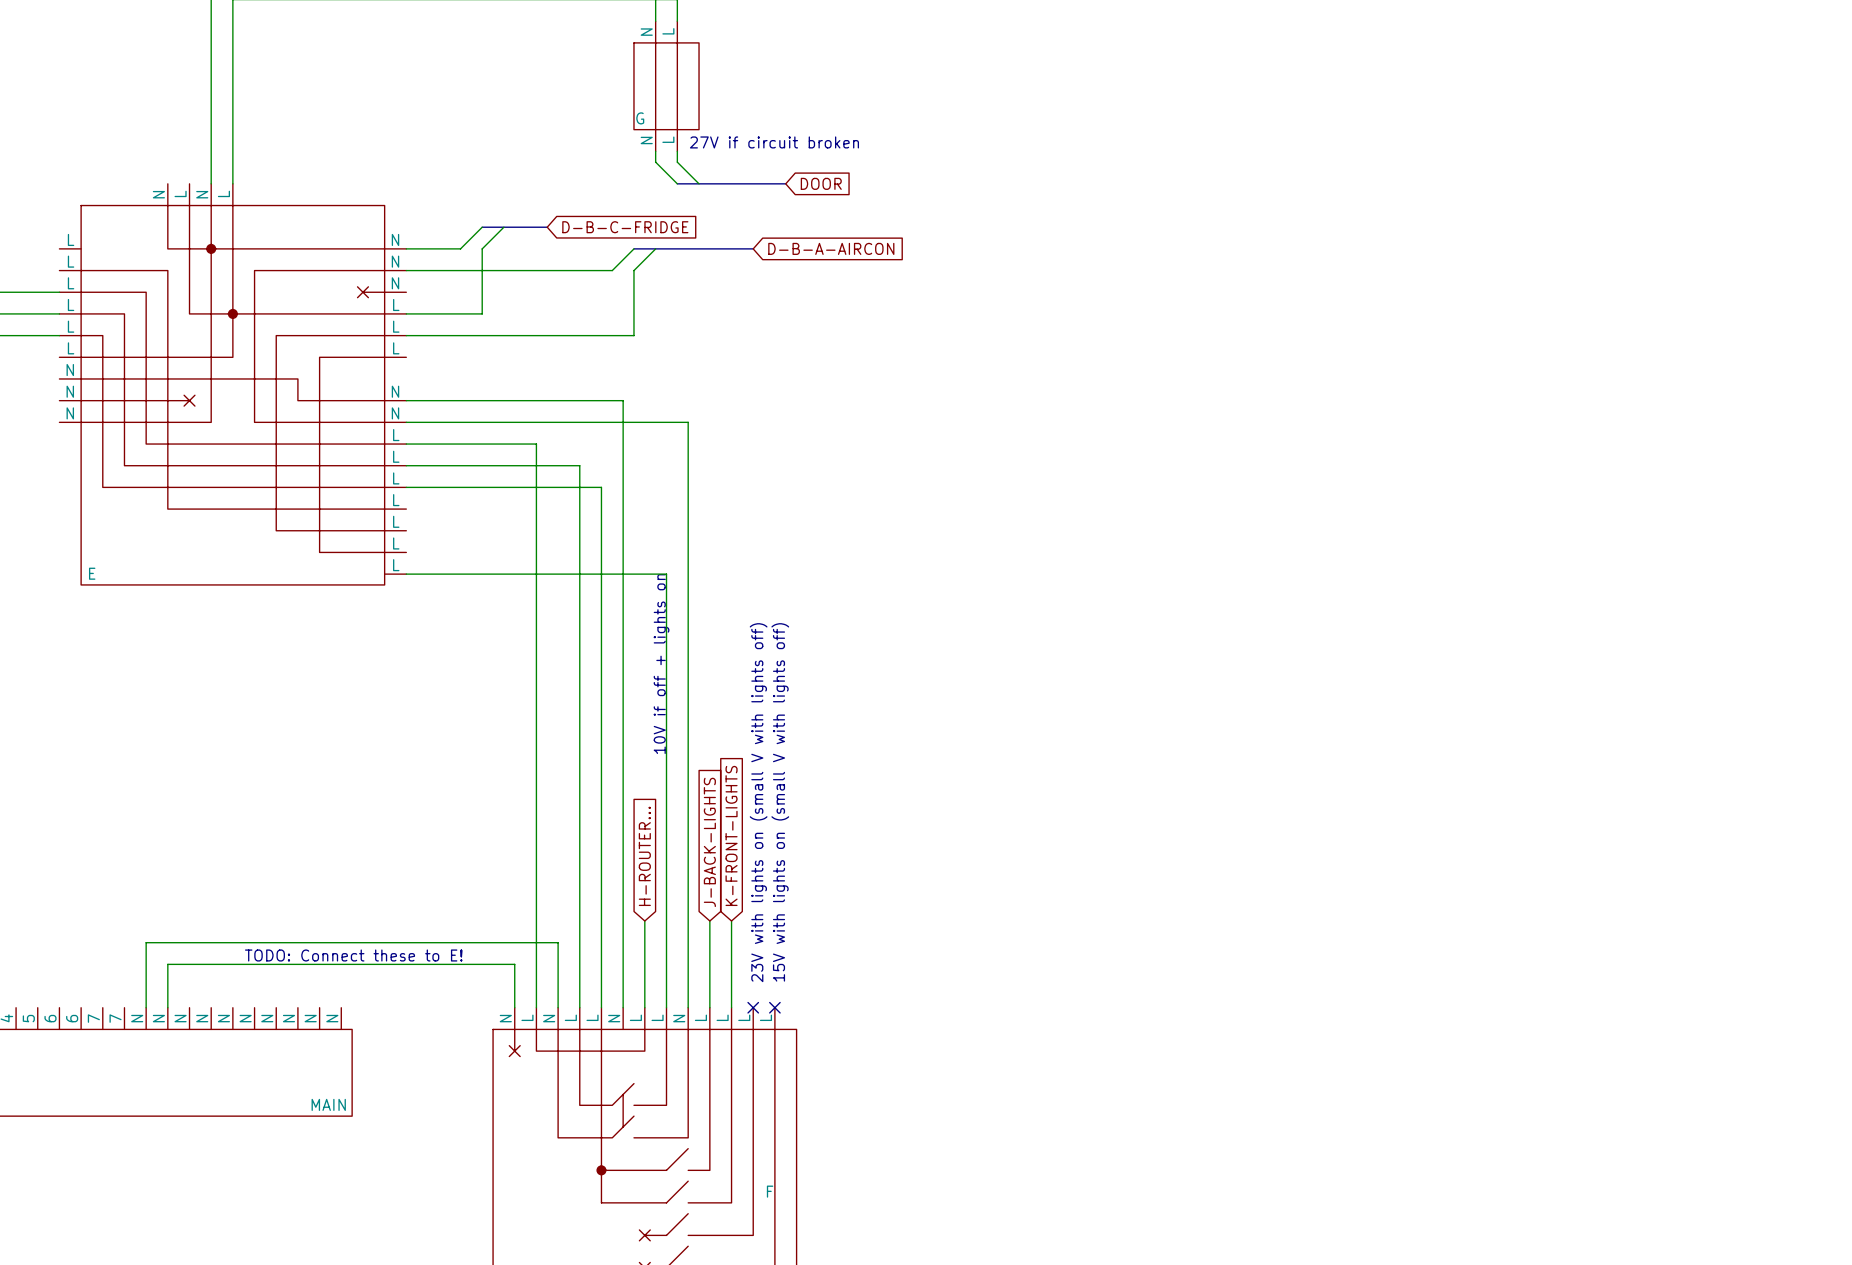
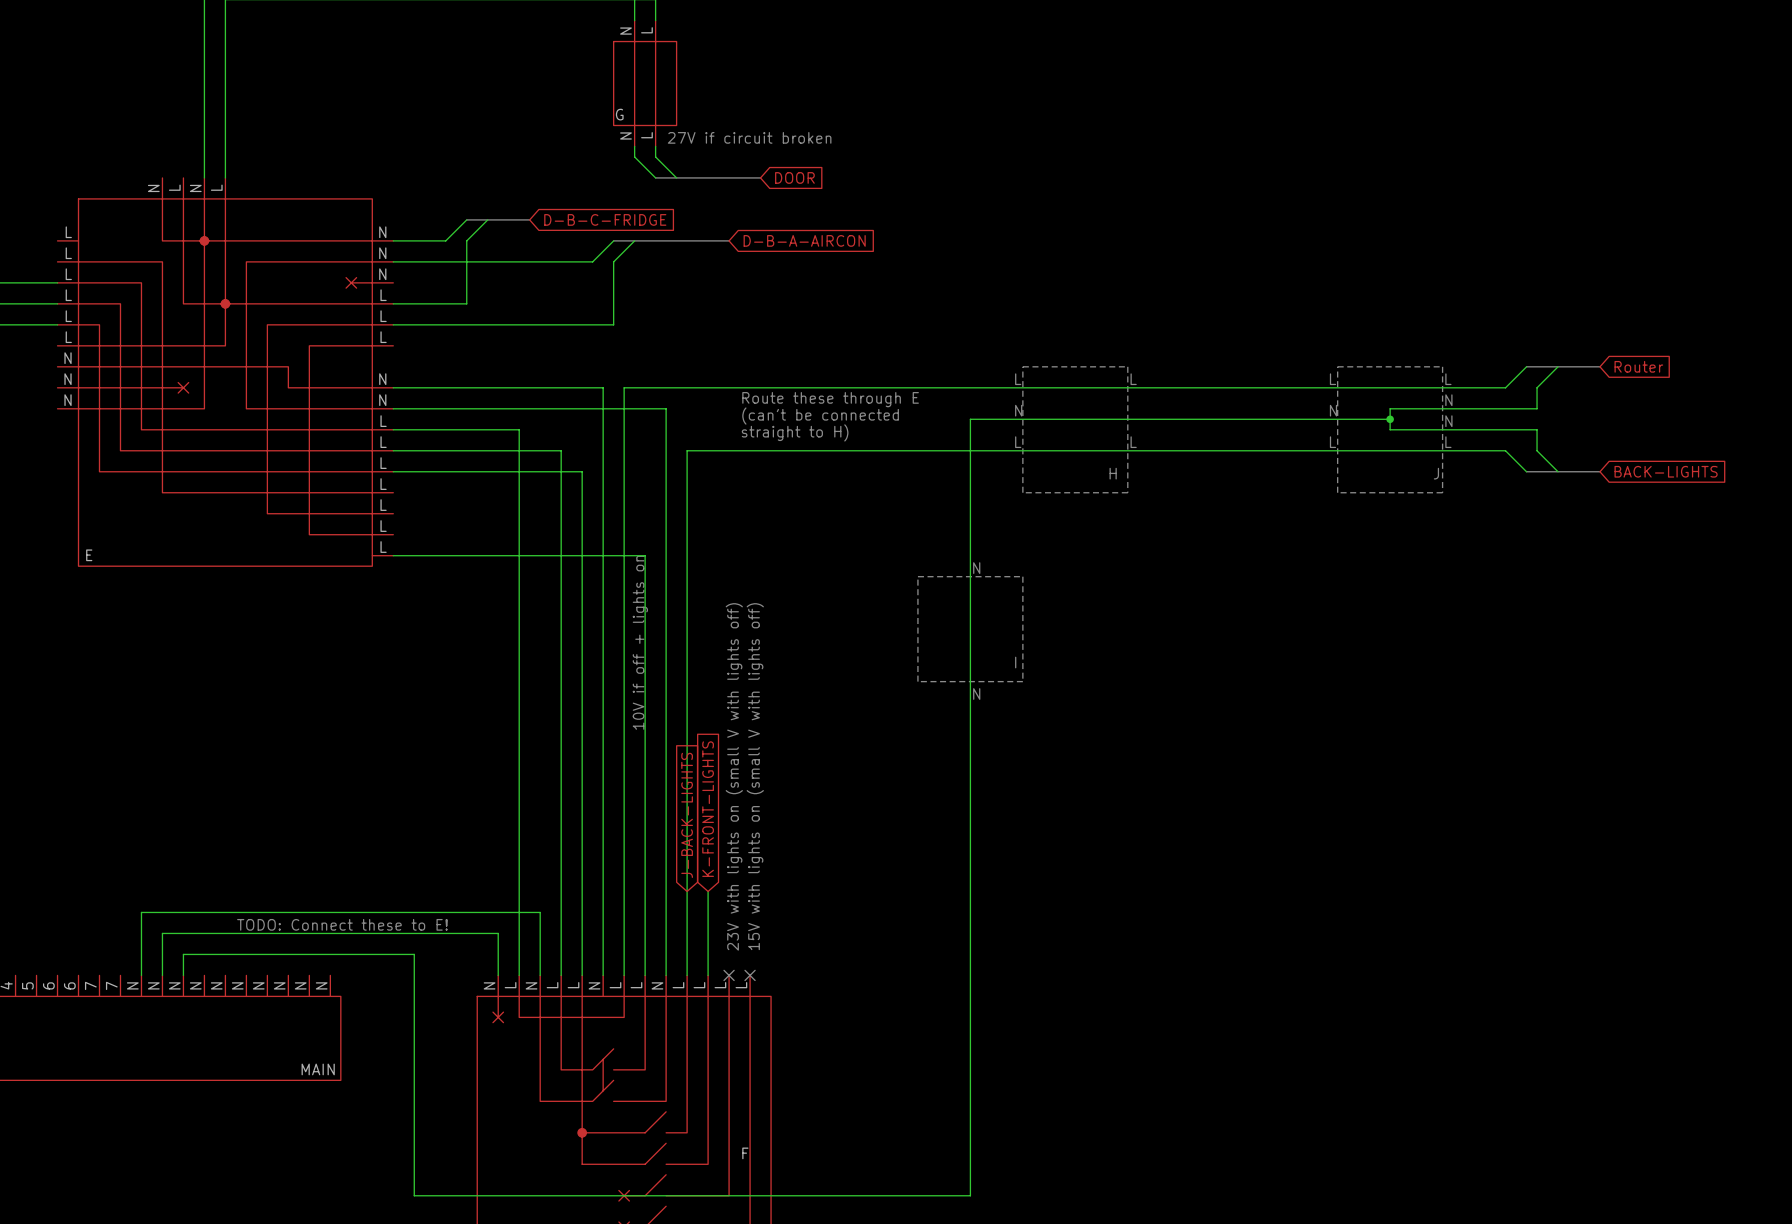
line: none -> (1022, 366) (1127, 366) (1127, 492) (1022, 492) (1022, 366)
line: none -> (1337, 366) (1442, 366) (1442, 492) (1337, 492) (1337, 366)
wire: none -> (1526, 366) (1505, 387) (624, 387) (624, 891)
bus: none -> (1526, 366) (1599, 366)
wire: none -> (1558, 366) (1537, 387) (1537, 408) (1390, 408) (1390, 429) (1537, 429) (1537, 450) (1558, 471)
global label: none -> Router (1638, 366)
text: none -> L (1018, 379)
text: none -> L (1133, 379)
text: none -> L (1332, 379)
text: none -> L (1448, 379)
text: none -> Route these through E (830, 399)
text: none -> N (1448, 400)
text: none -> N (1018, 410)
text: none -> N (1333, 410)
text: none -> (can't be connected (820, 416)
wire: none -> (1390, 419) (970, 419) (970, 1195) (414, 1195) (414, 954) (183, 954) (183, 975)
junction: none -> (1390, 419)
text: none -> N (1448, 421)
text: none -> straight to H) (795, 432)
text: none -> L (1018, 442)
text: none -> L (1133, 442)
text: none -> L (1332, 442)
text: none -> L (1448, 442)
wire: none -> (1526, 471) (1505, 450) (687, 450) (687, 891)
bus: none -> (1526, 471) (1599, 471)
global label: none -> BACK-LIGHTS (1666, 471)
text: none -> H (1113, 473)
text: none -> J (1436, 473)
text: none -> N (976, 568)
line: none -> (917, 576) (1022, 576) (1022, 681) (917, 681) (917, 576)
text: none -> I (1015, 662)
text: none -> N (976, 694)
global label: H-ROUTER... (644, 856) -> none

